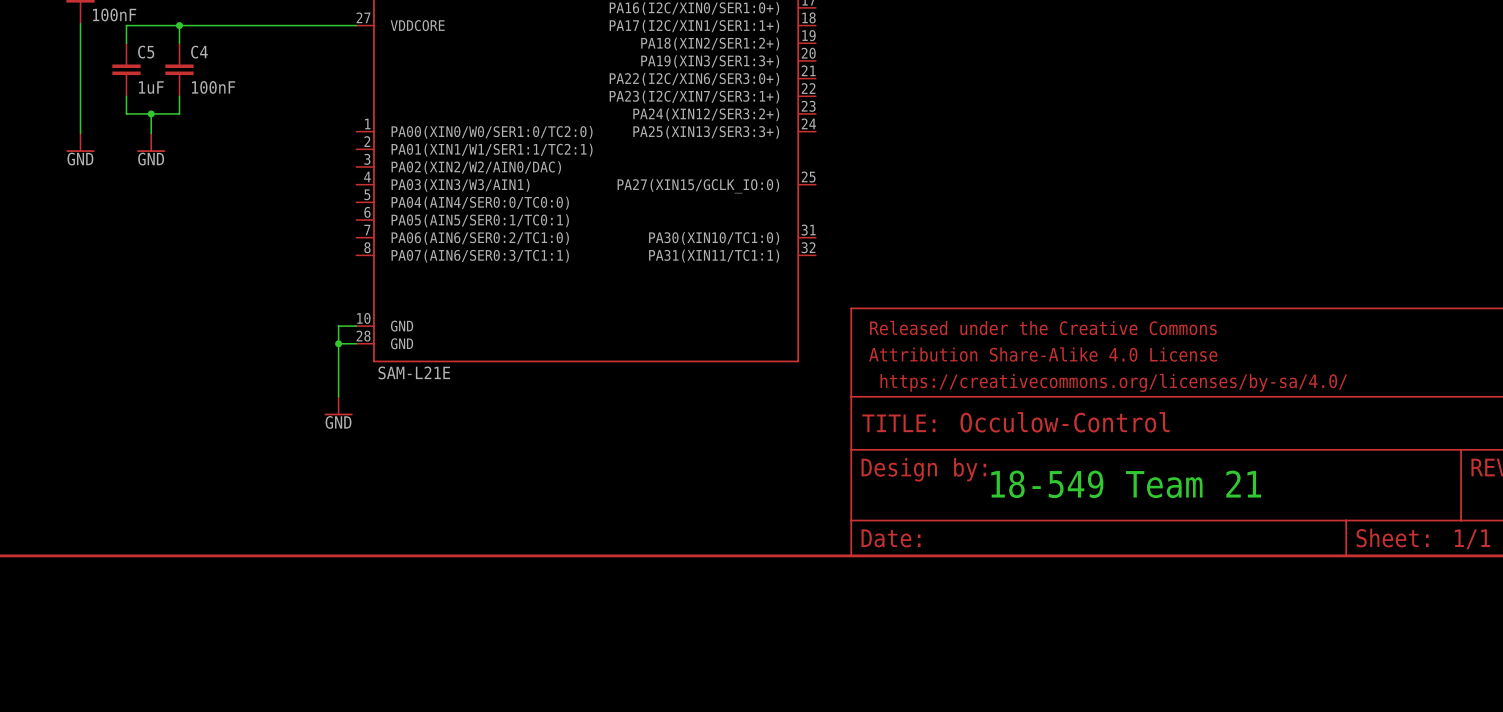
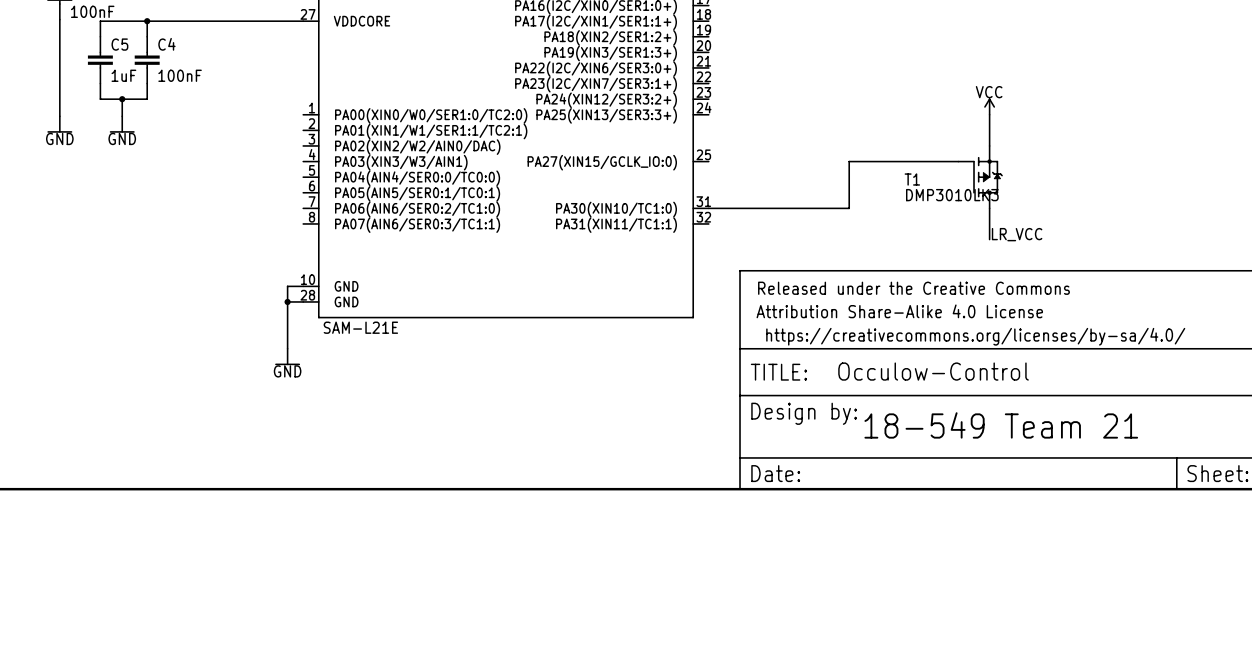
power symbol: none -> VCC (989, 106)
wire: none -> (989, 114) (989, 145)
wire: none -> (958, 161) (849, 161) (849, 208) (708, 208)
T1: none -> DMP3010LK3 (980, 177)
wire: none -> (989, 208) (989, 239)
label: none -> LR_VCC (1017, 234)

